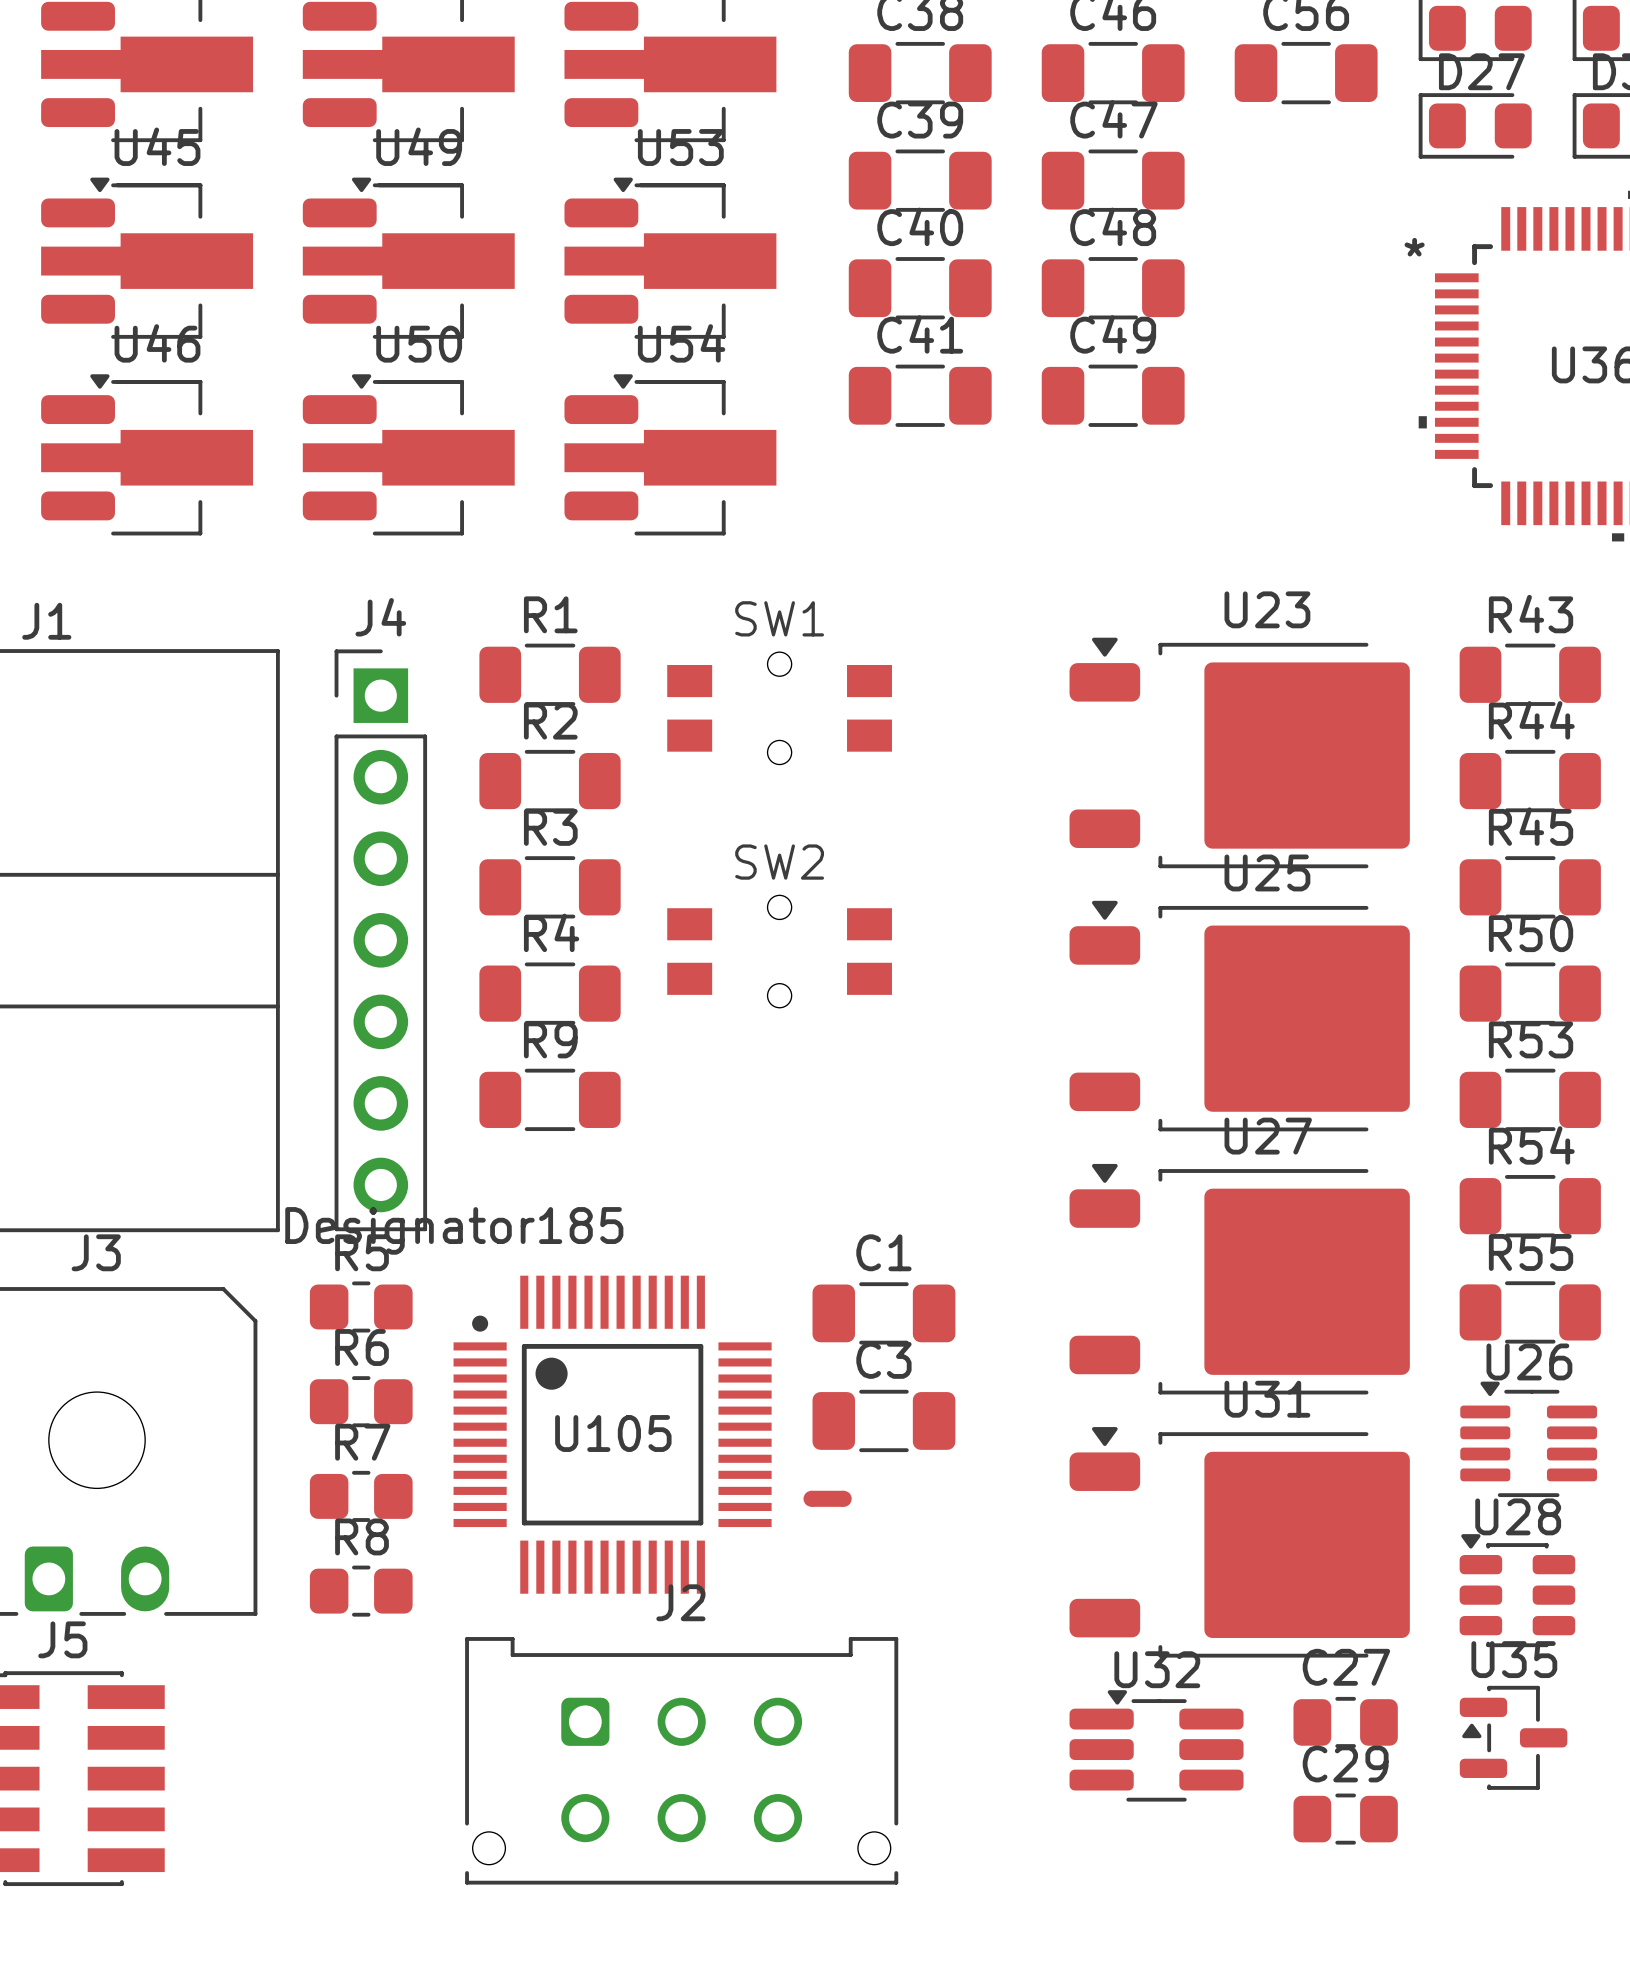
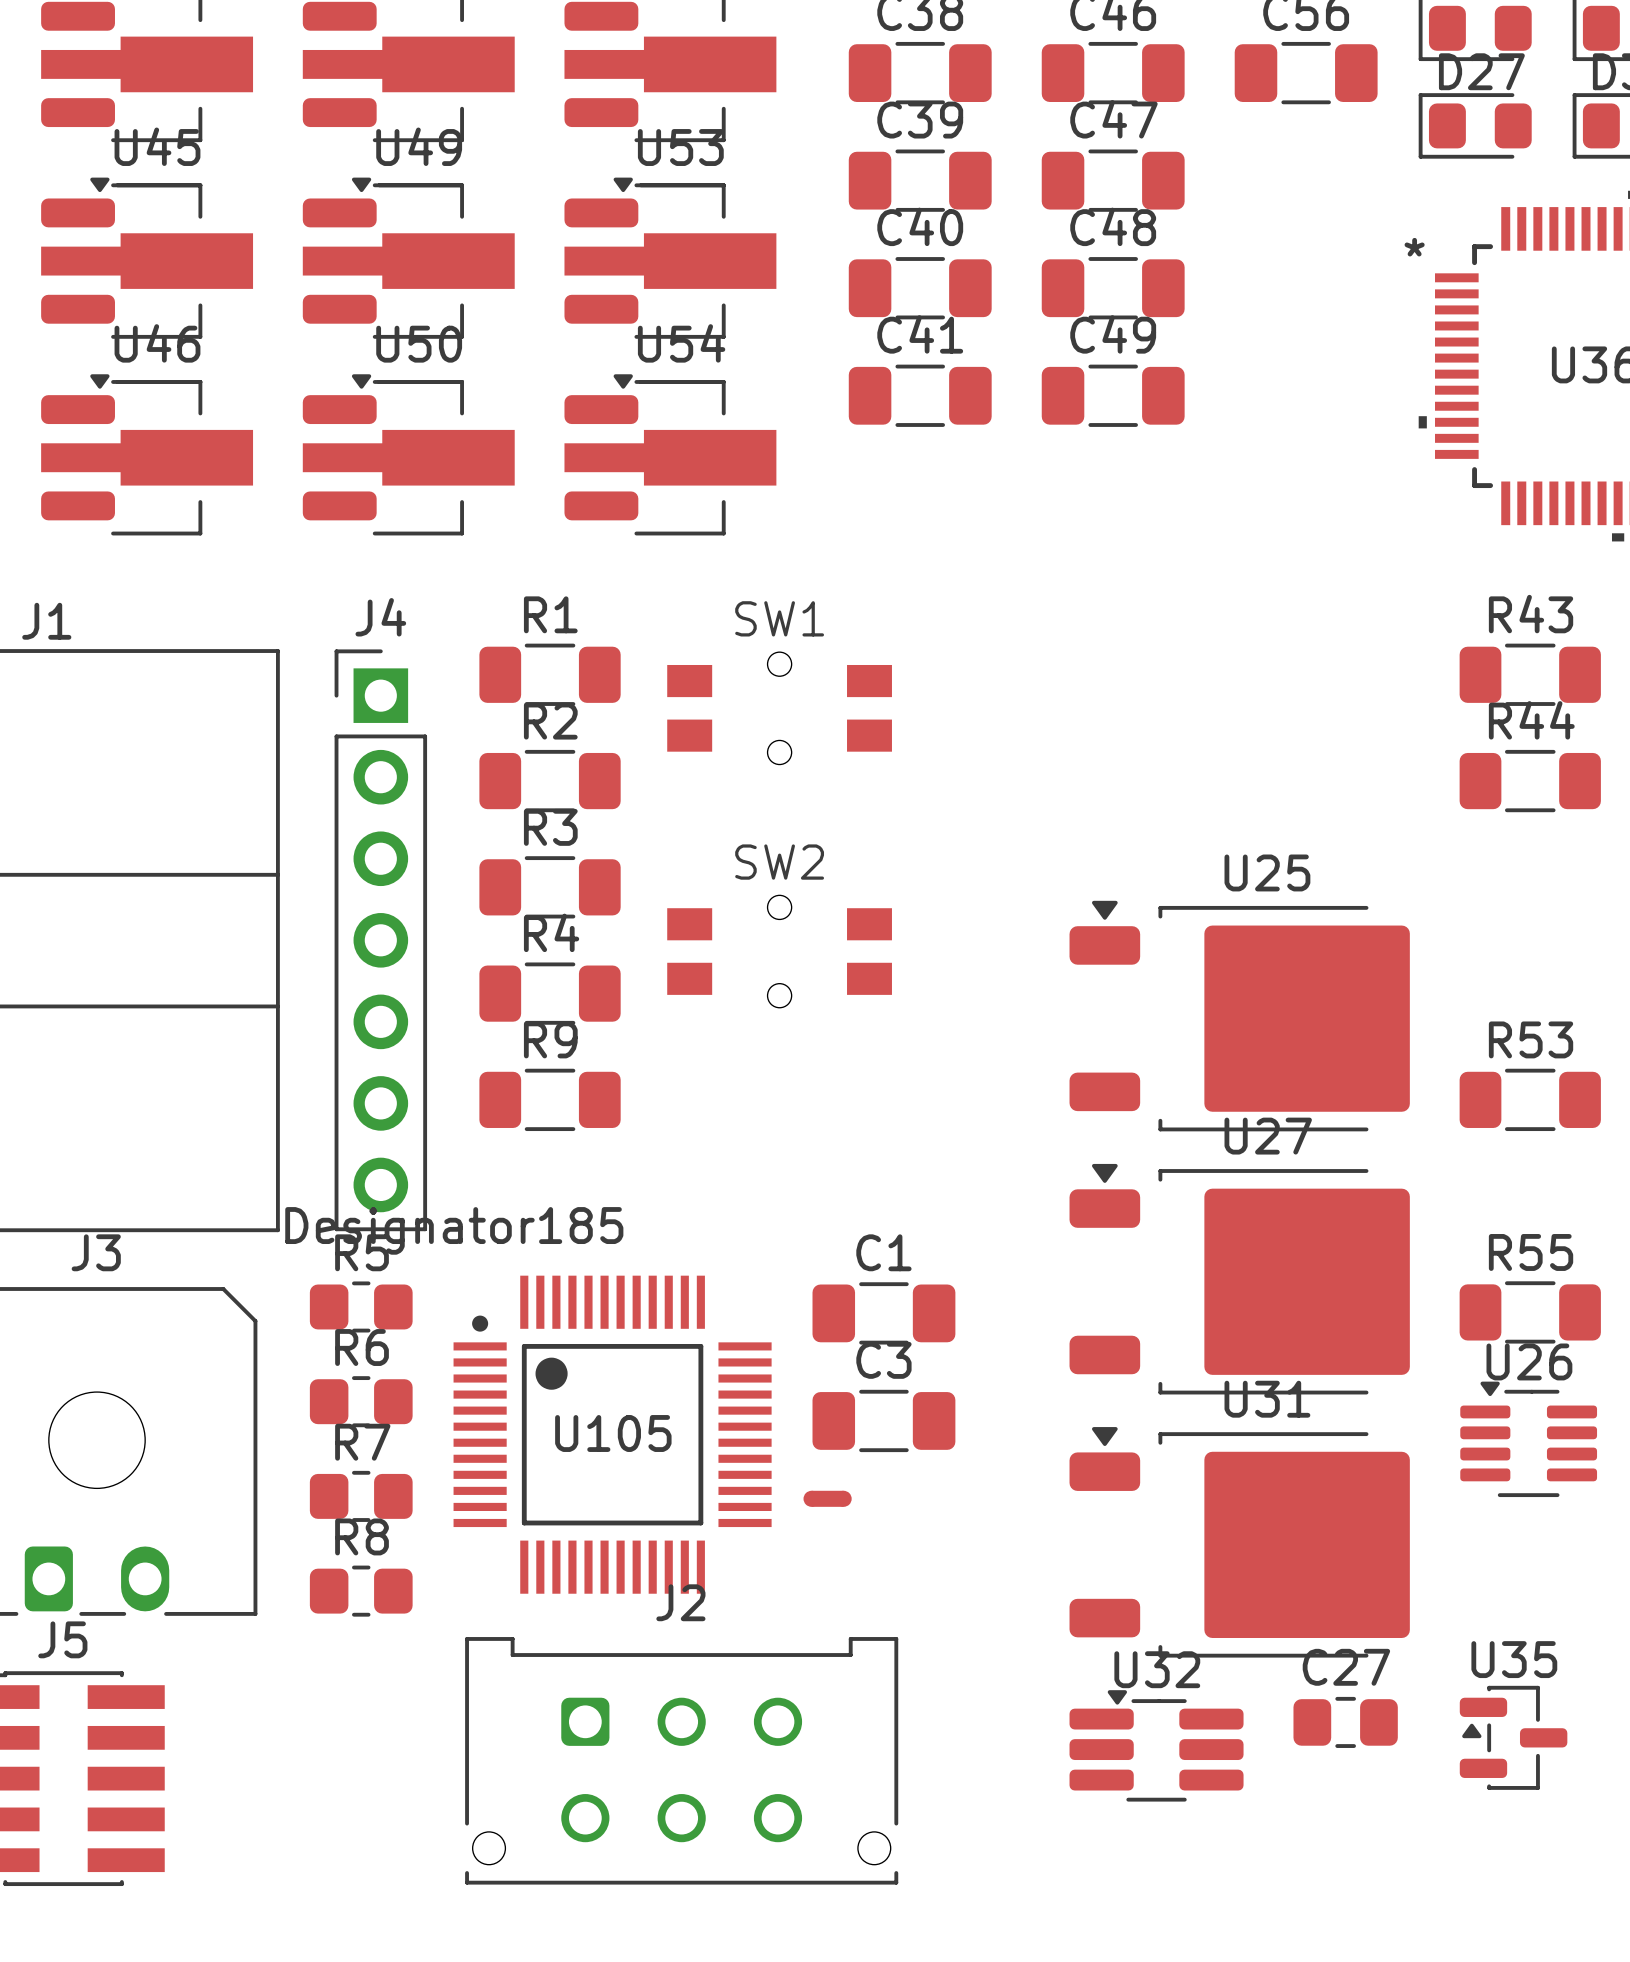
U23: (1239, 752) -> none
R45: (1530, 887) -> none
R50: (1530, 993) -> none
R54: (1530, 1206) -> none
U28: (1517, 1590) -> none
C29: (1345, 1819) -> none

